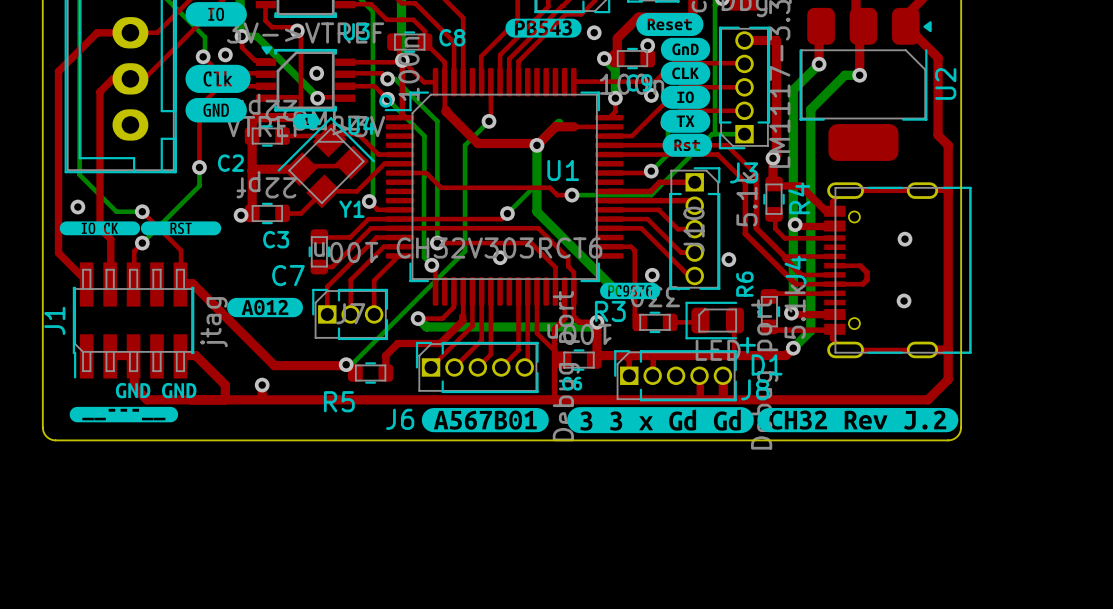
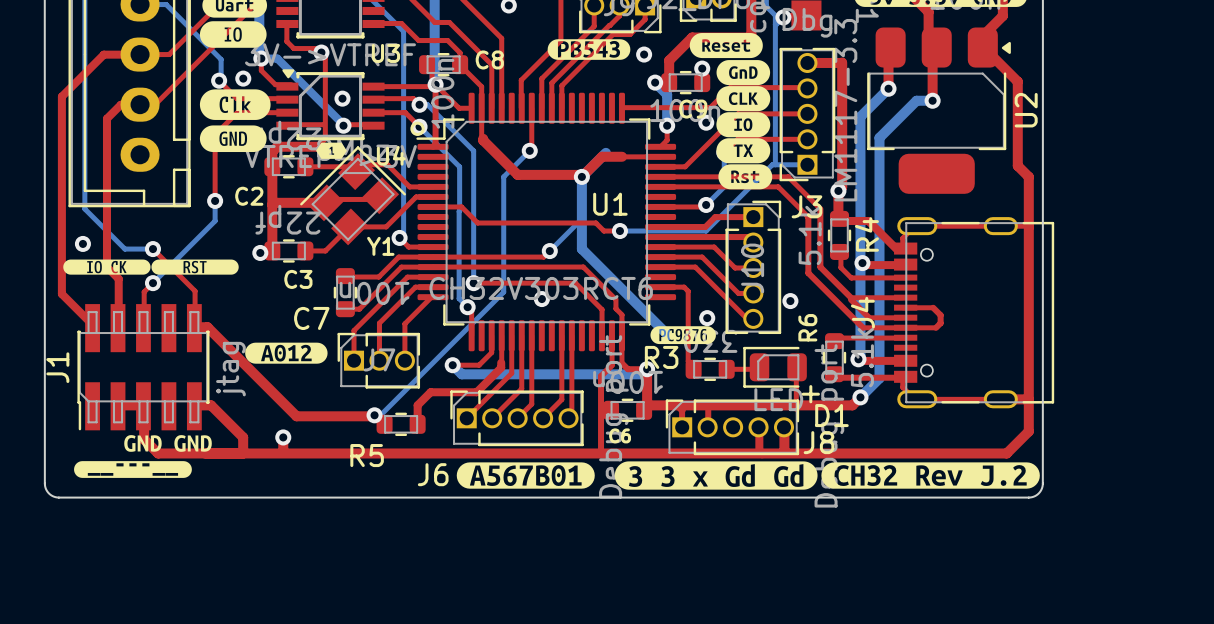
via: (904, 239) -> none
top track: (536, 291) (536, 333) (563, 360) -> none
via: (904, 300) -> none

